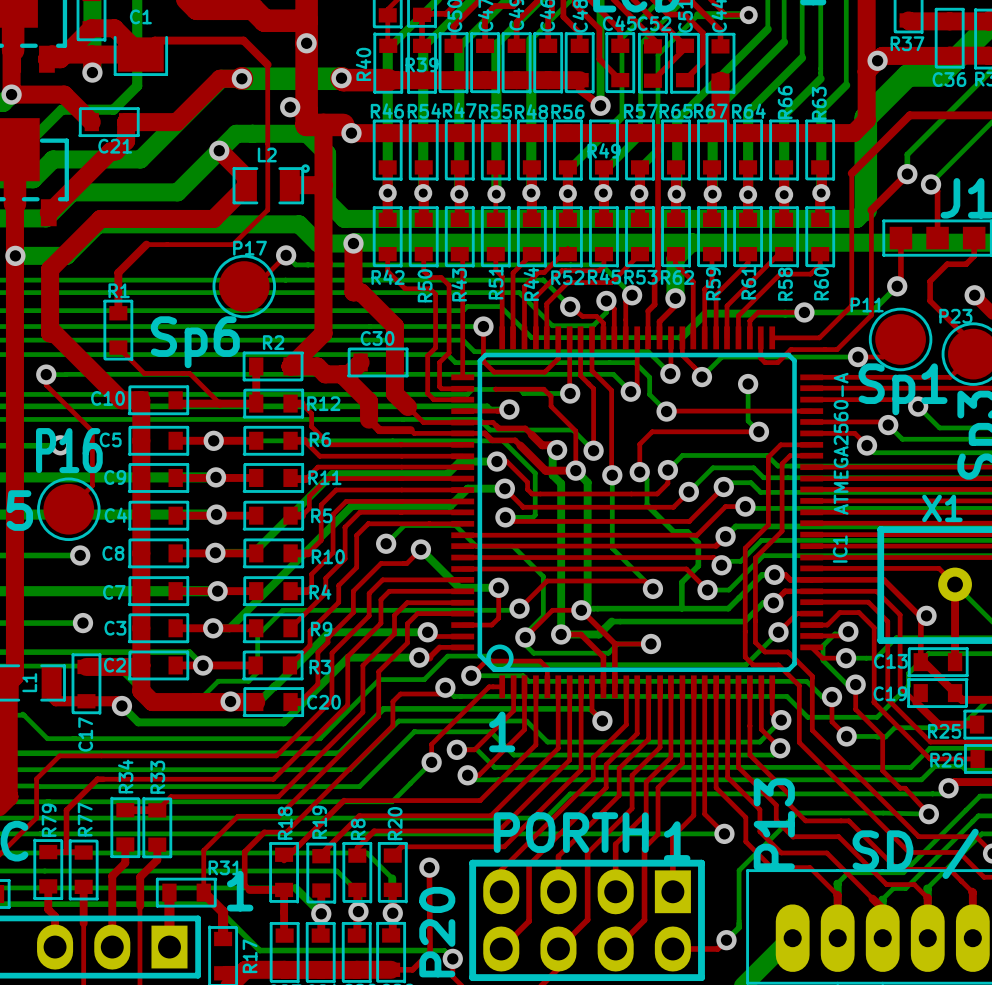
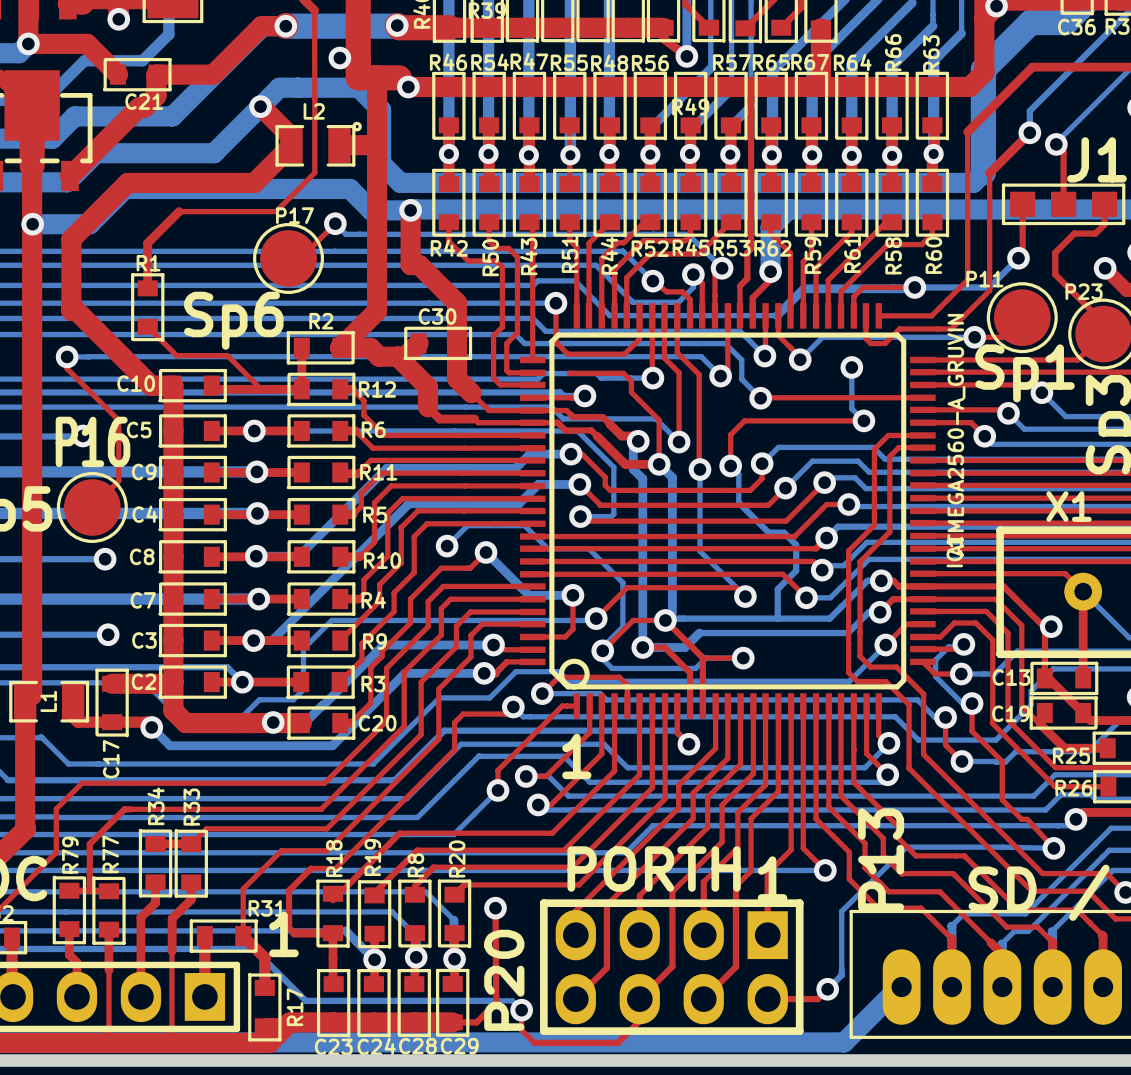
IC1 value: ATMEGA2560-A (841, 443) -> ATMEGA2560-A_GRUVIN (956, 435)

